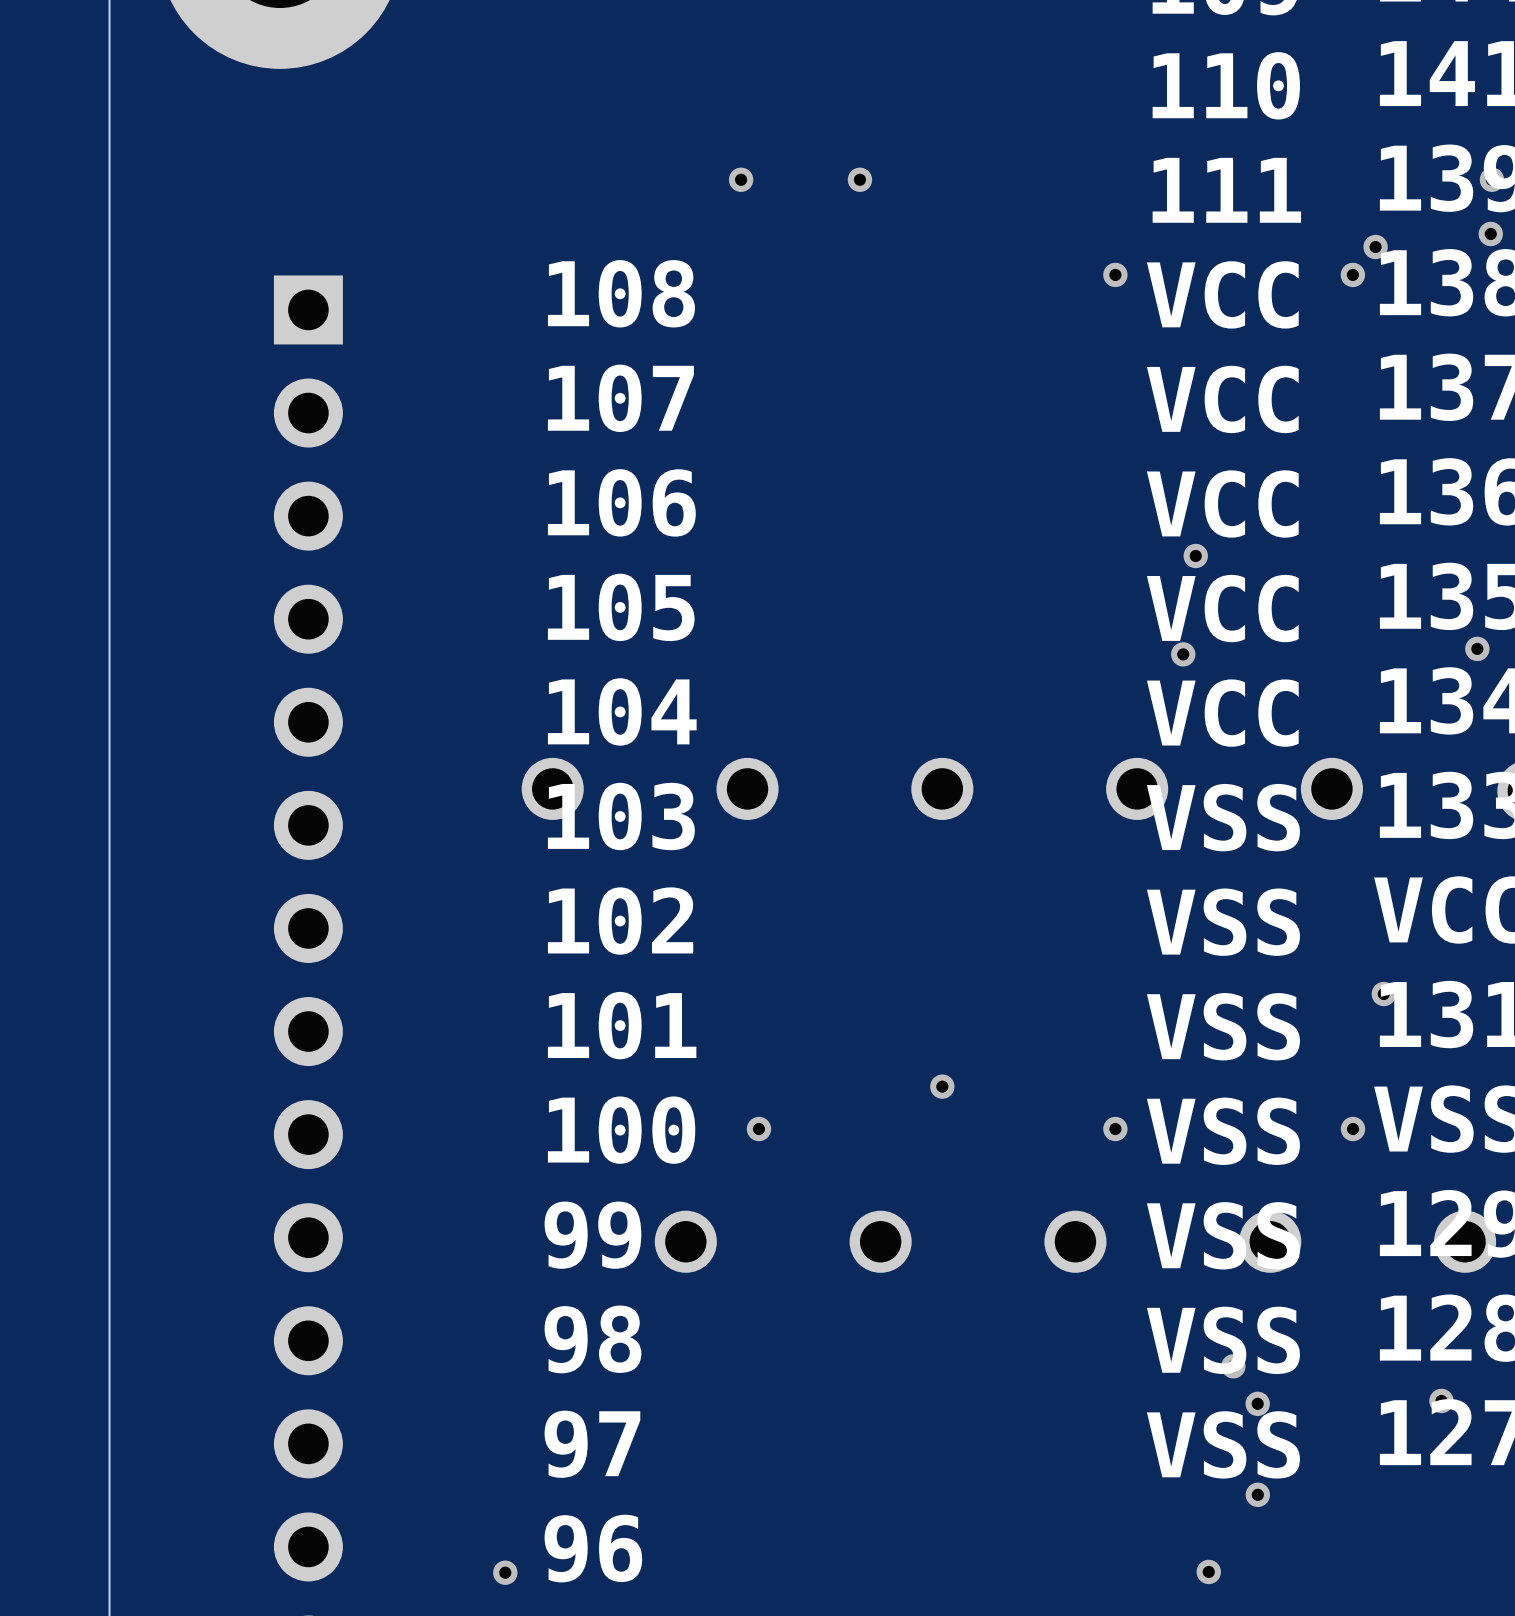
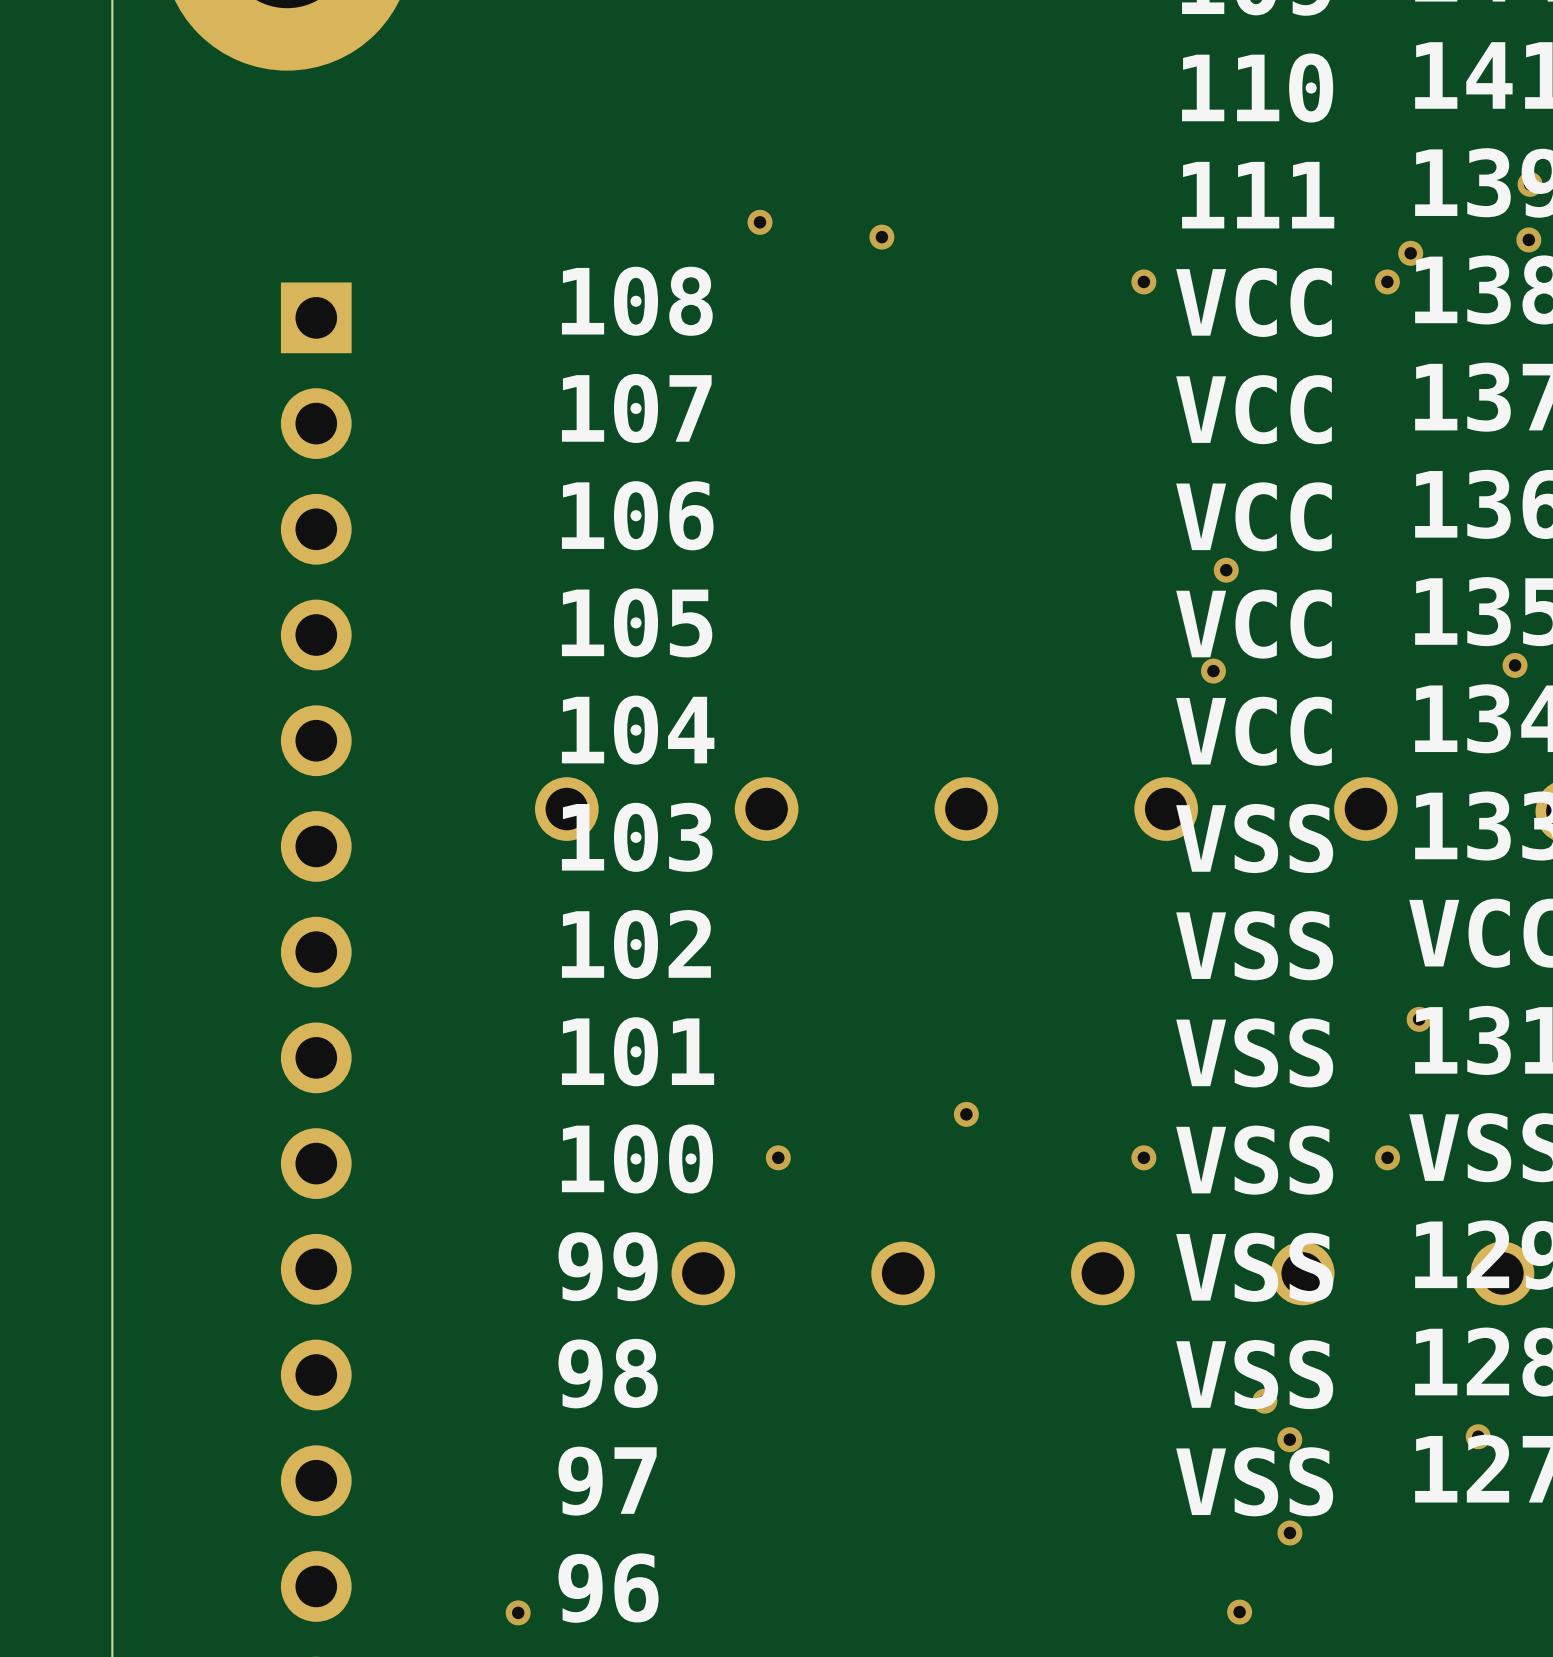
via position: (741, 179) -> (760, 222)
via position: (859, 179) -> (881, 237)

